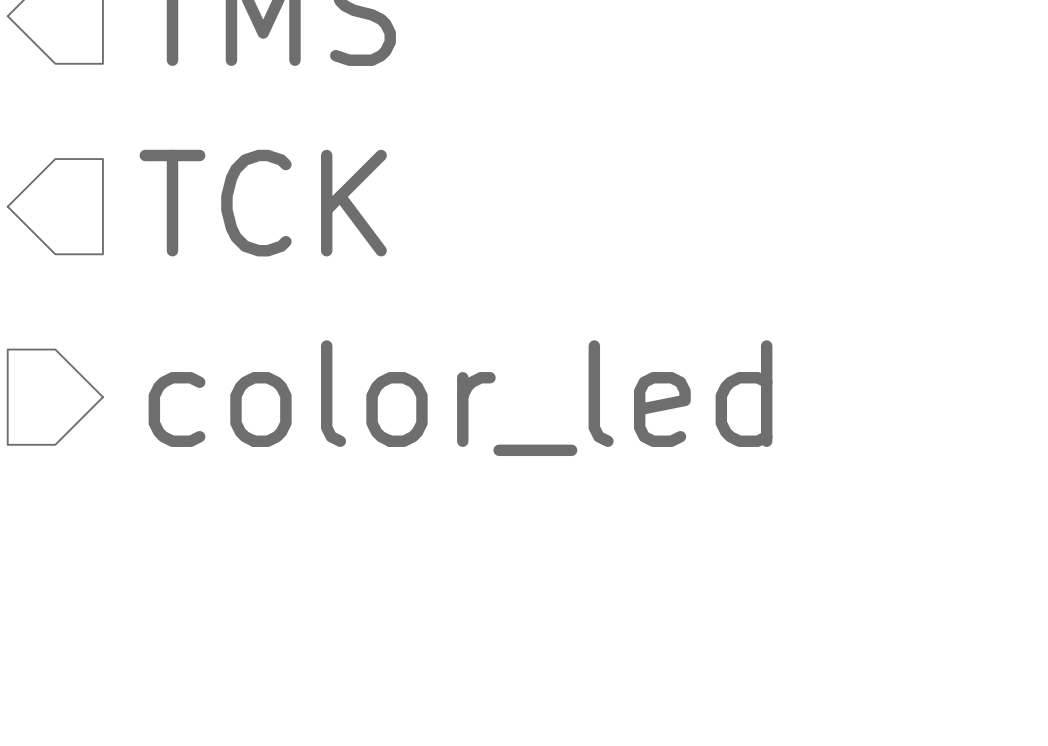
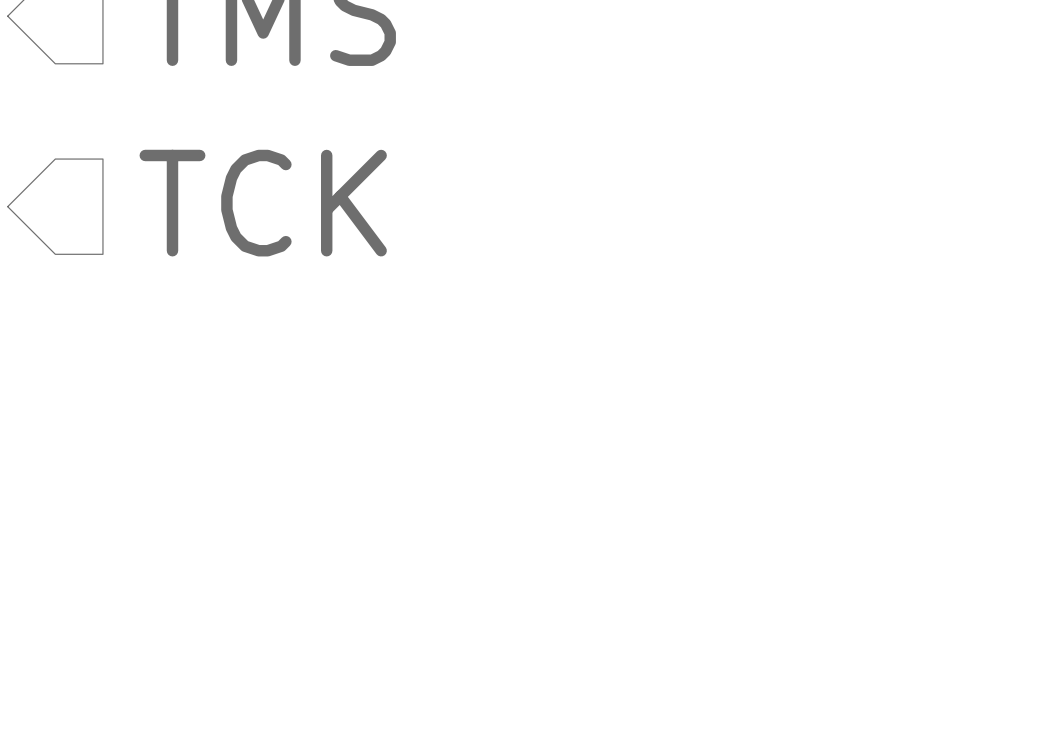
hierarchical label: color_led (460, 398) -> none

